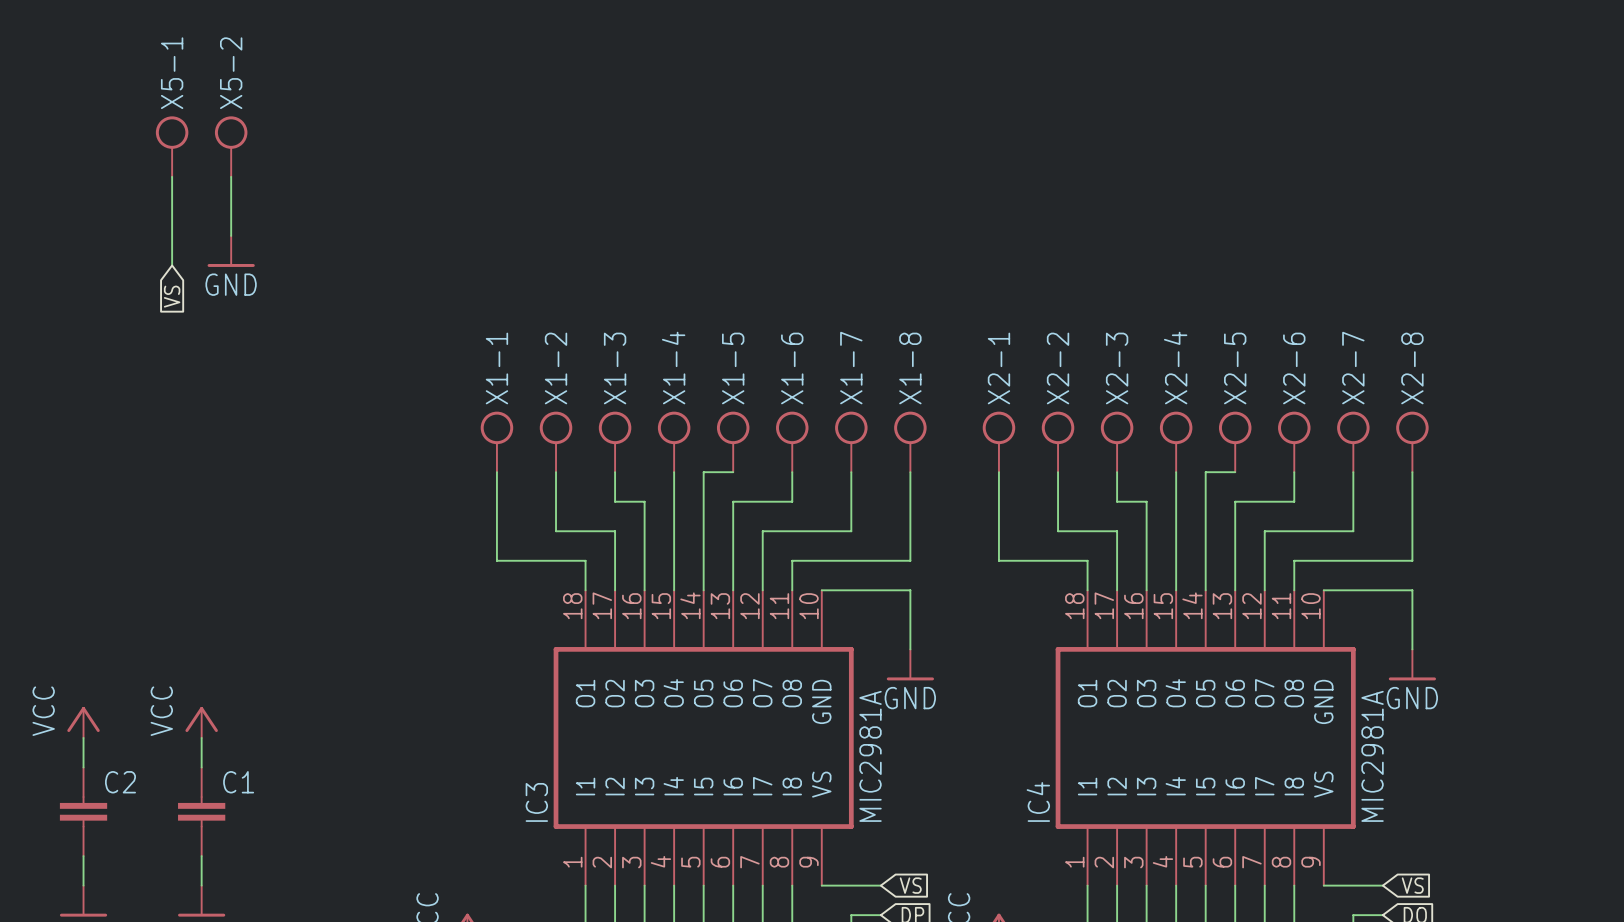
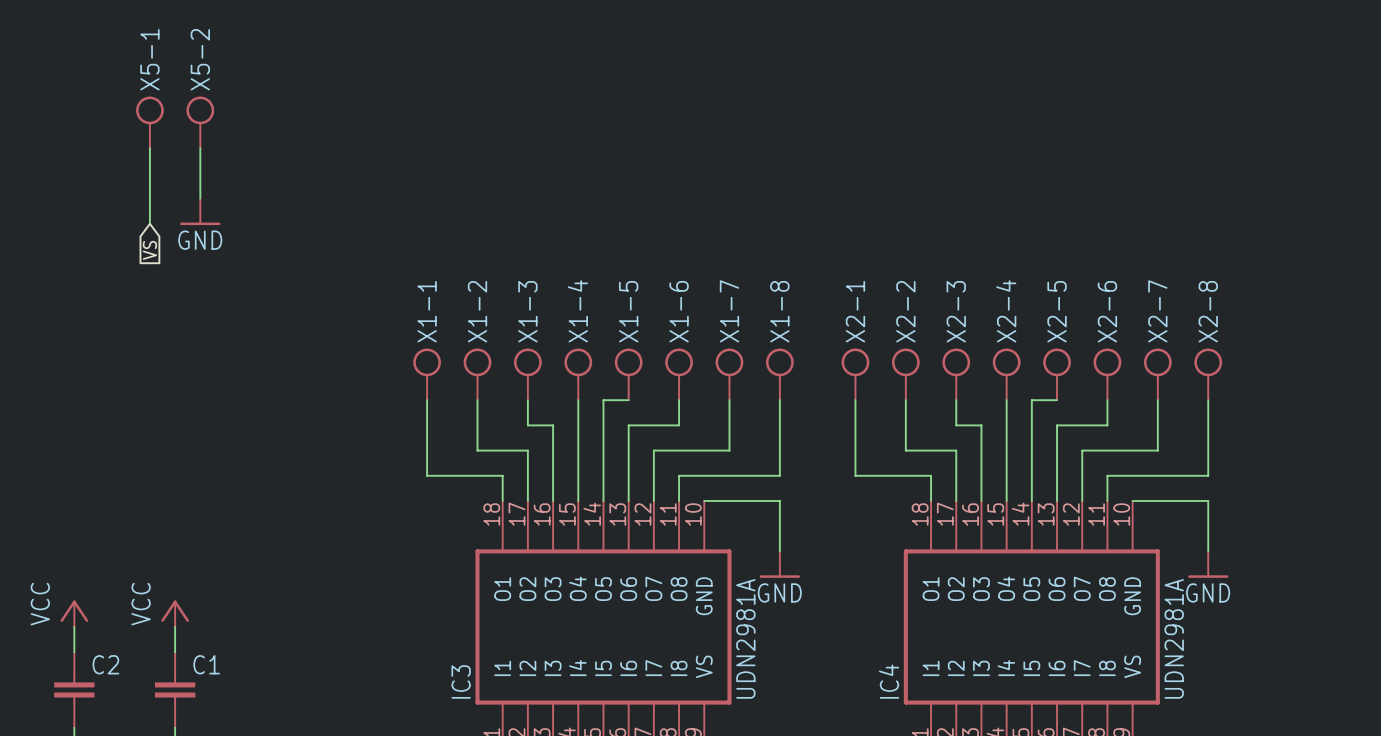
IC3 value: MIC2981A (870, 756) -> UDN2981A (745, 638)
IC4 value: MIC2981A (1372, 756) -> UDN2981A (1174, 638)

